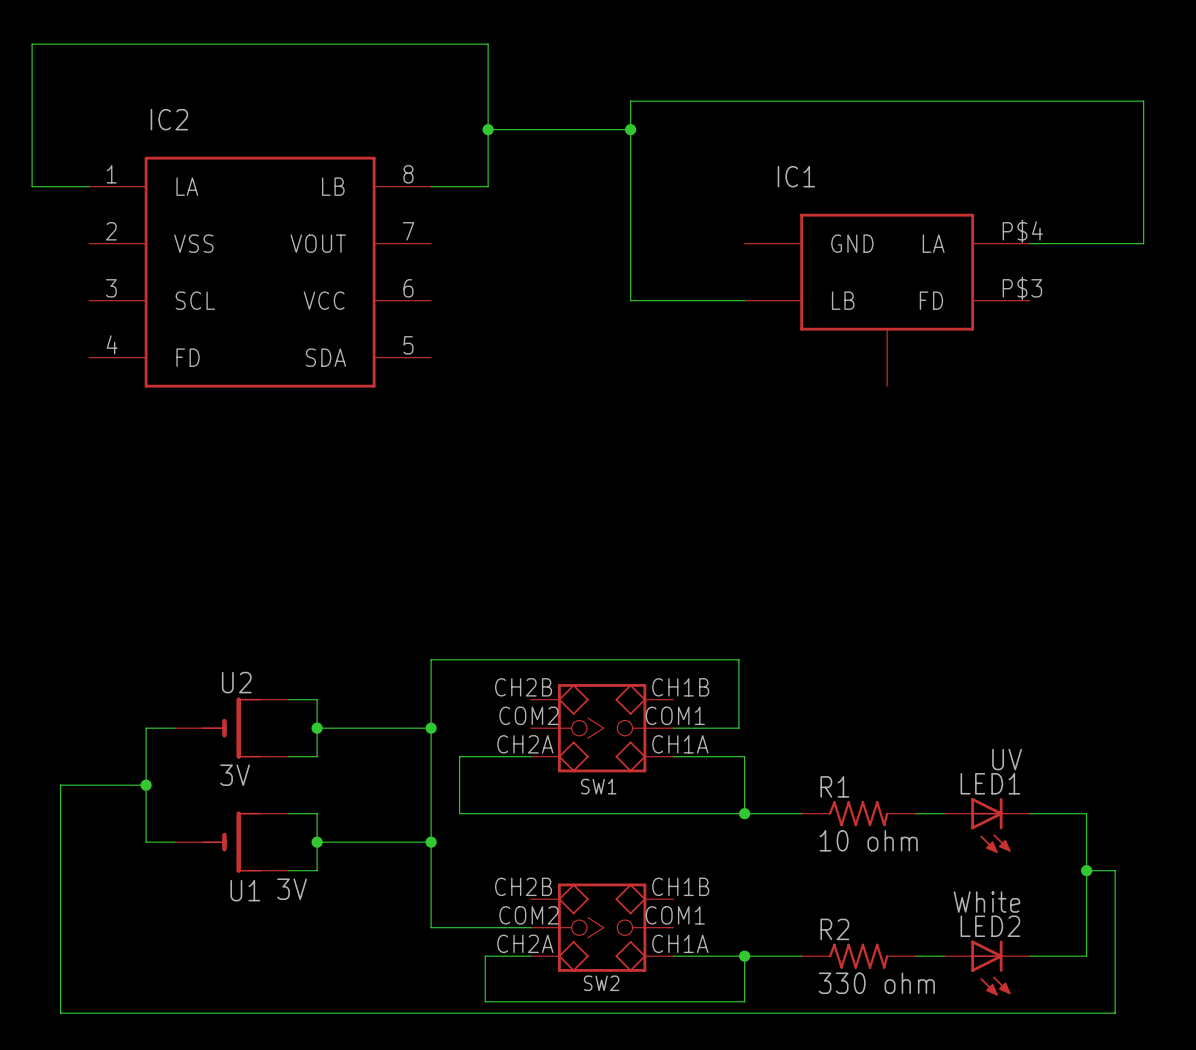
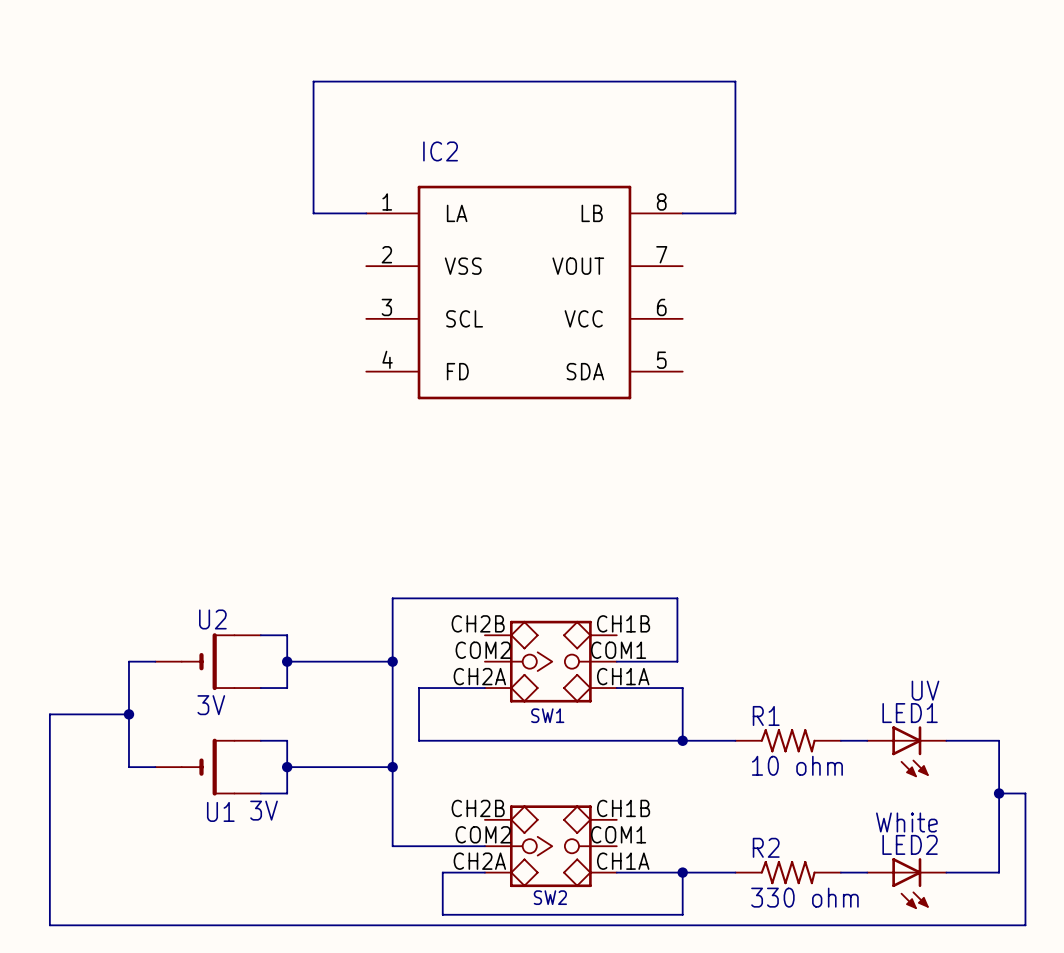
wire: (630, 101) (630, 300) (744, 300) -> (577, 81) (313, 81) (313, 213) (366, 213)
wire: (801, 101) (1143, 101) (1143, 243) (1029, 243) -> (735, 81) (735, 213) (682, 213)
wire: (488, 129) (630, 129) -> none
junction: (488, 129) -> none
junction: (630, 129) -> none
wire: (89, 186) (32, 186) (32, 44) (488, 44) (488, 186) (431, 186) -> none
IC2 position: (260, 272) -> (524, 292)
IC1: (887, 299) -> none

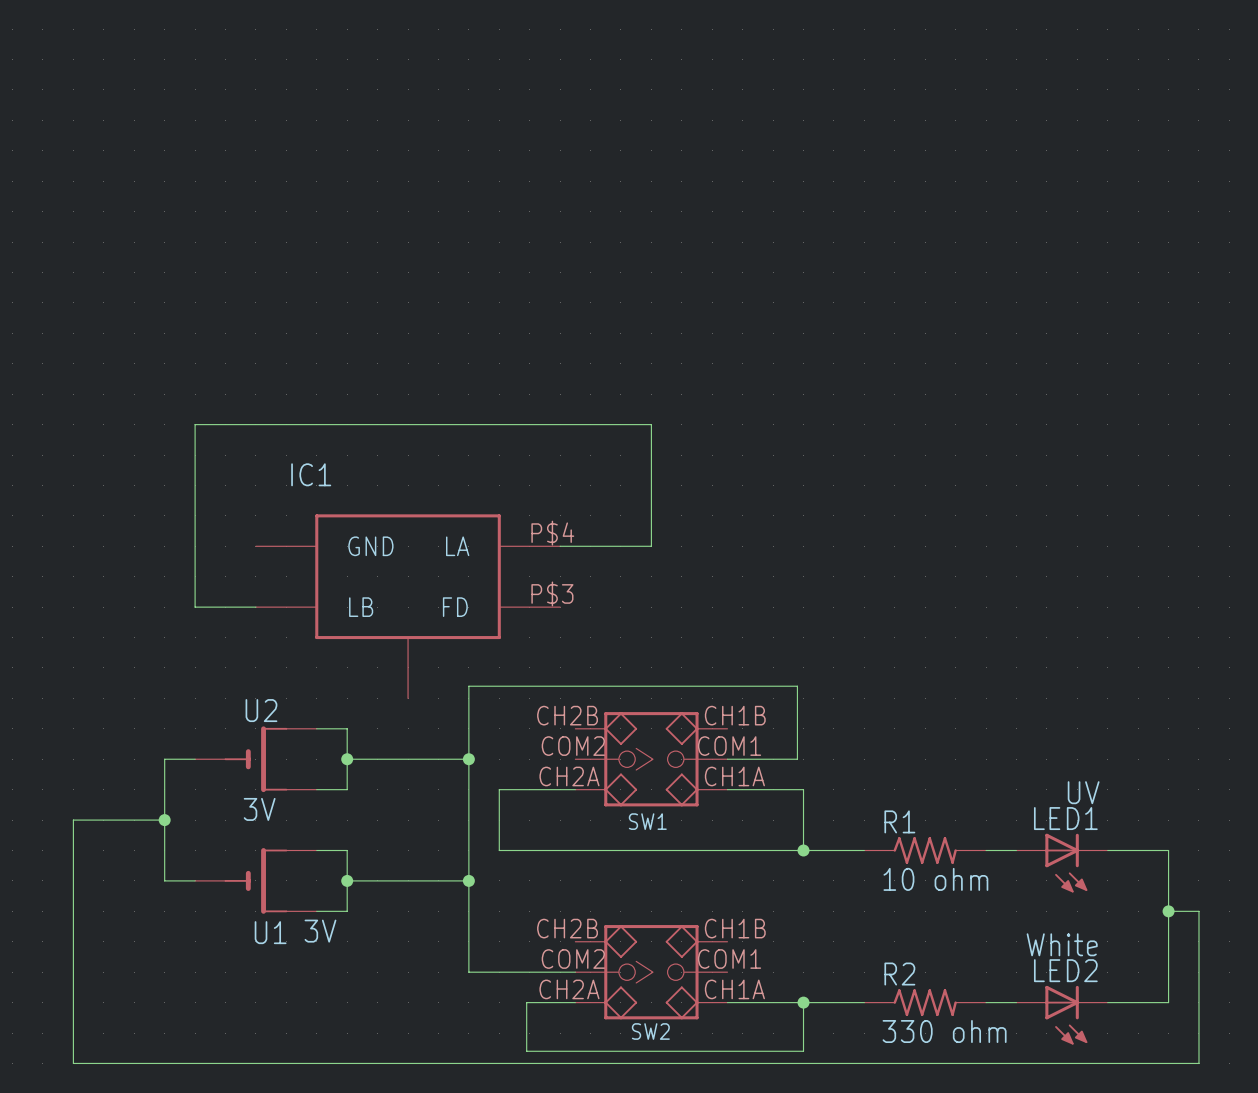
wire: (366, 213) (313, 213) (313, 81) (735, 81) (735, 213) (682, 213) -> none
IC2: (524, 292) -> none
wire: none -> (560, 546) (651, 546) (651, 424) (195, 424) (195, 607) (255, 607)
IC1: none -> (408, 606)

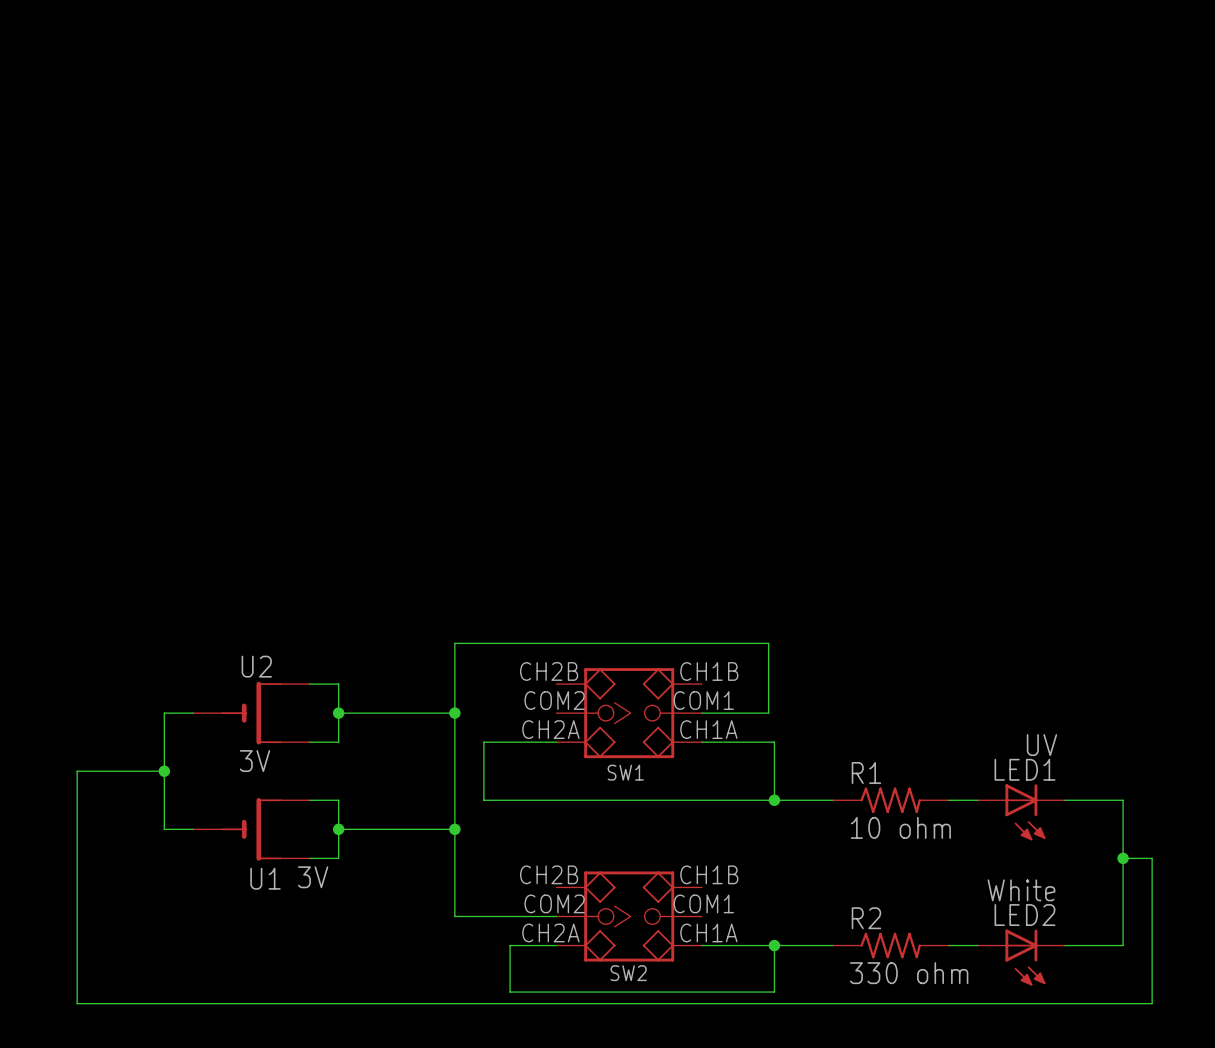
wire: (560, 546) (651, 546) (651, 424) (195, 424) (195, 607) (255, 607) -> none
IC1: (408, 606) -> none

